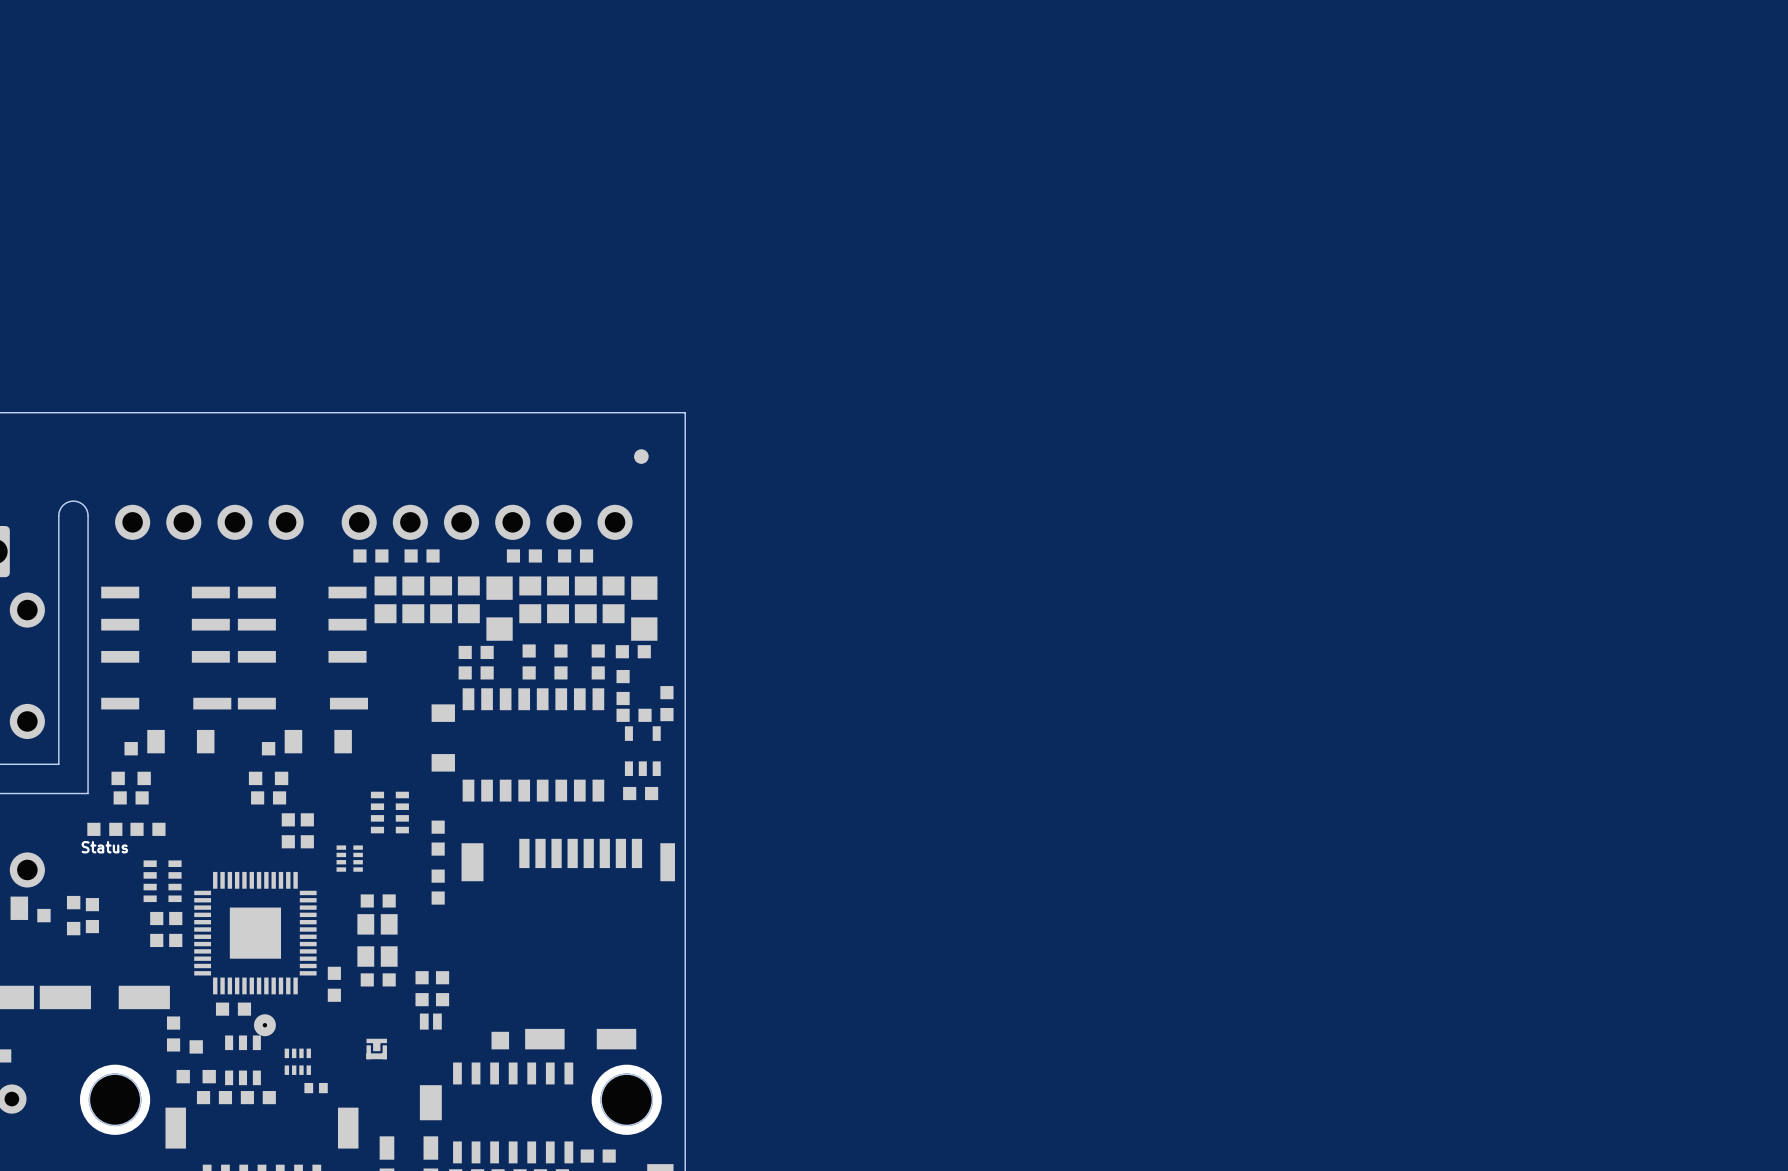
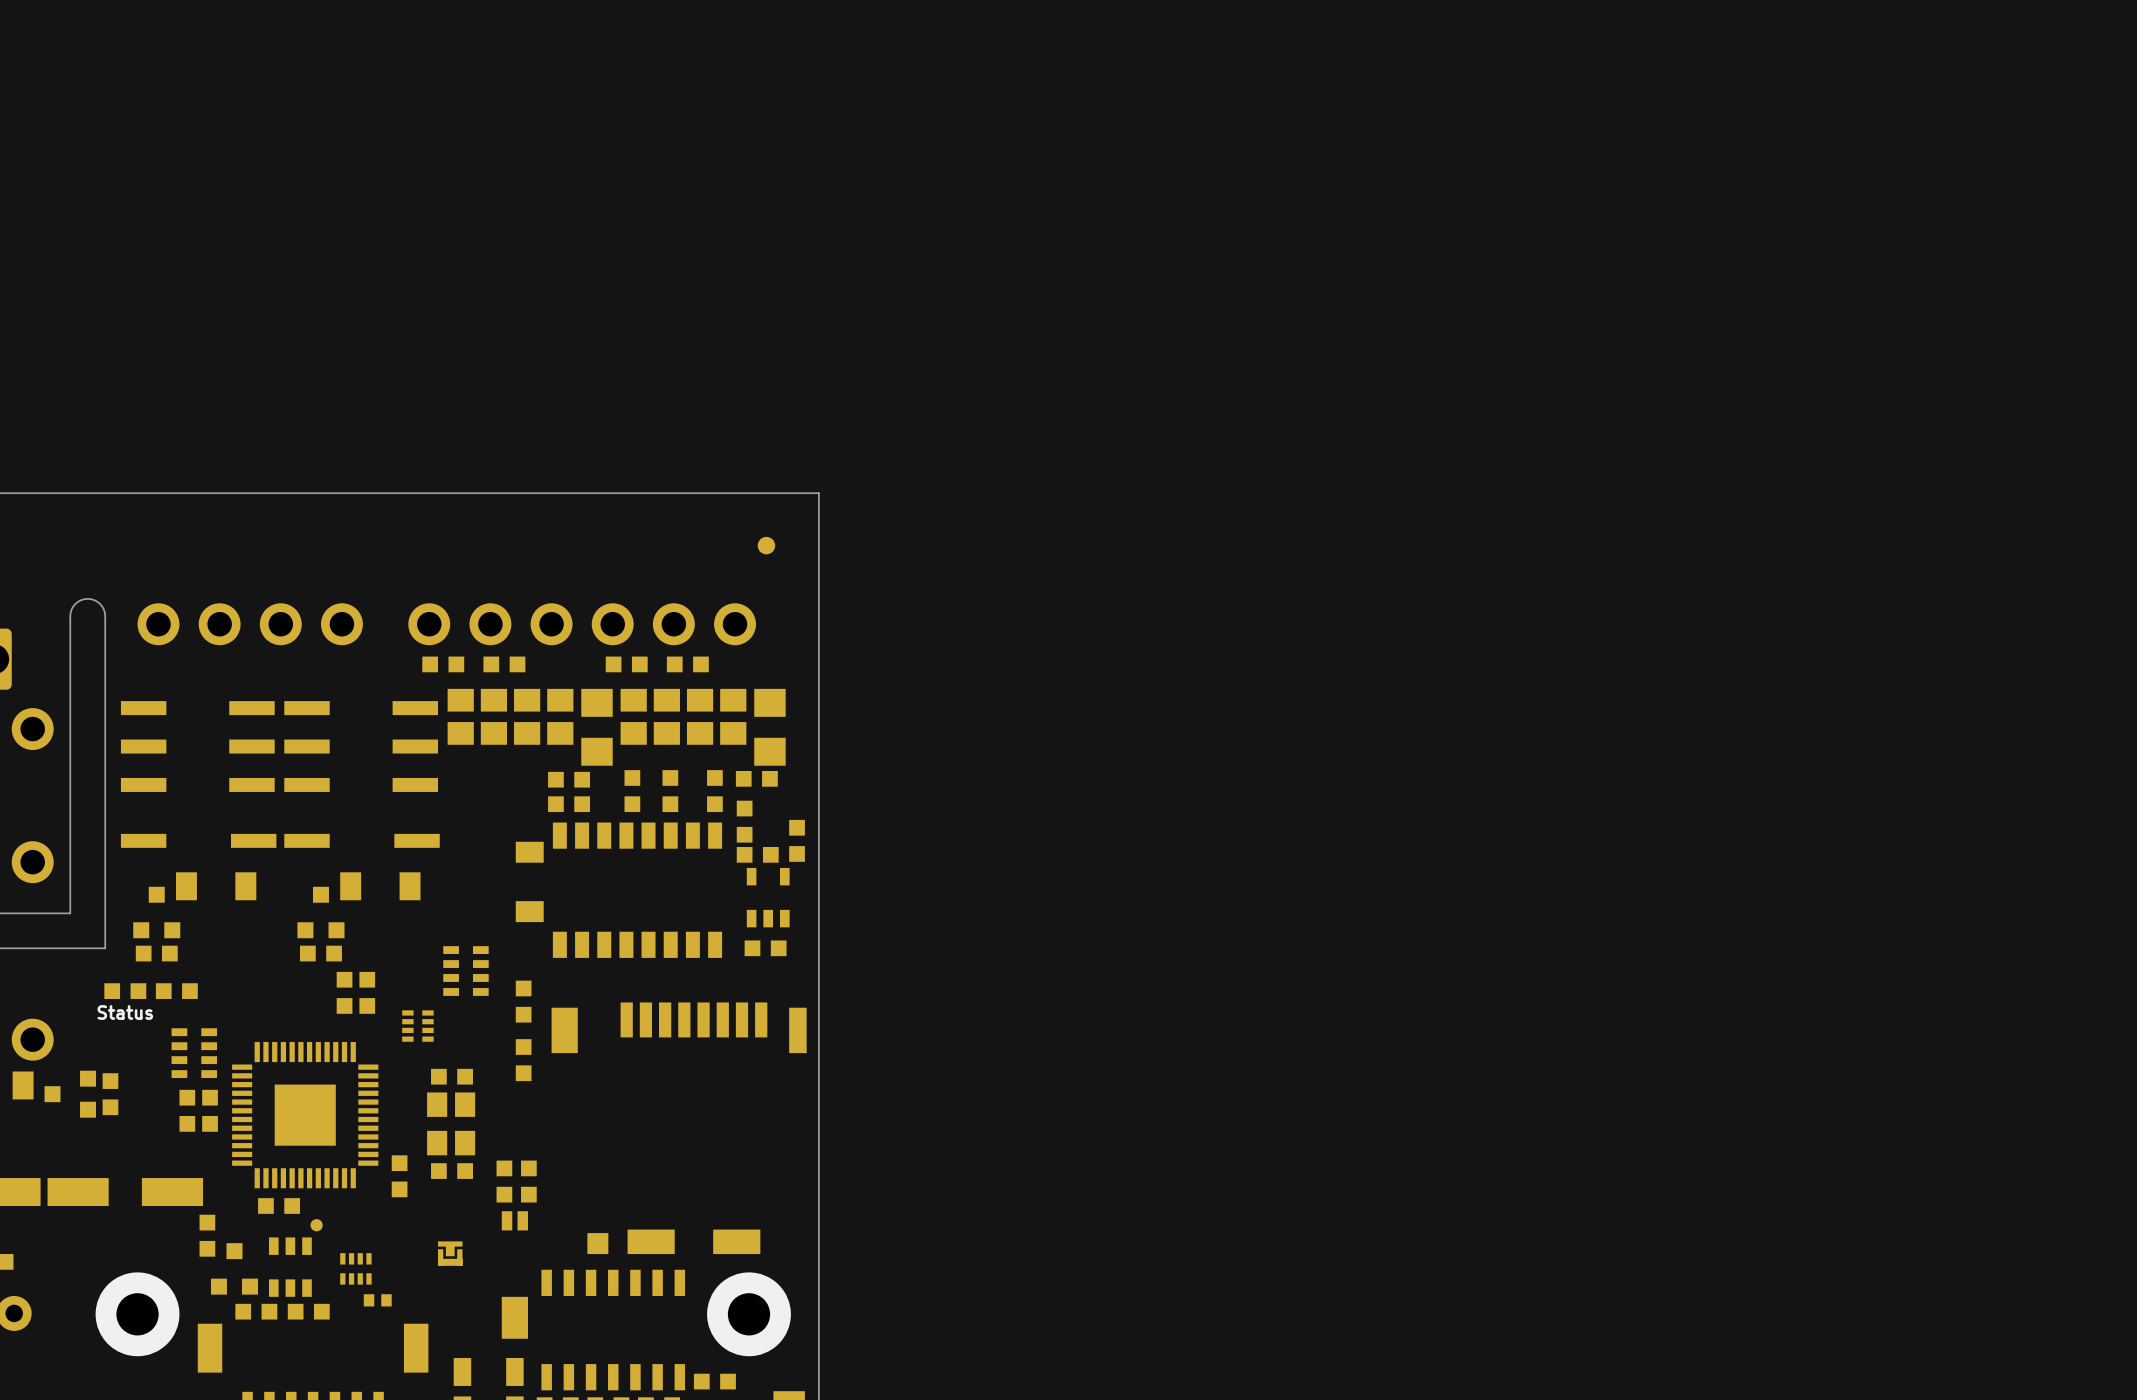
part footprint: [253, 1014, 276, 1037] -> [310, 1219, 323, 1232]
part footprint: [80, 1064, 151, 1135] -> [95, 1272, 180, 1357]
part footprint: [591, 1064, 662, 1135] -> [707, 1272, 791, 1357]

